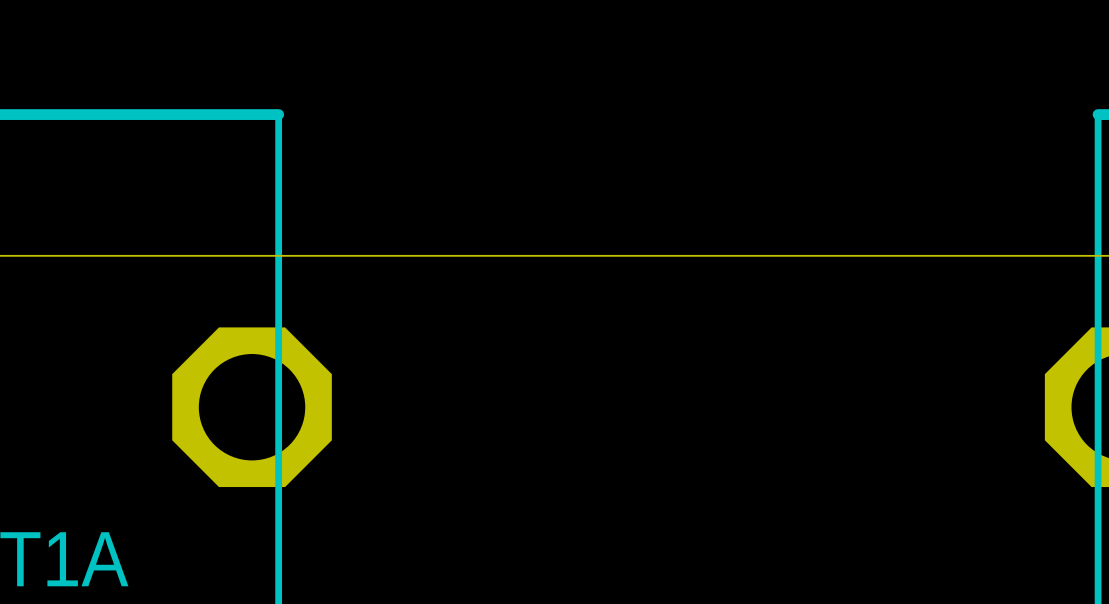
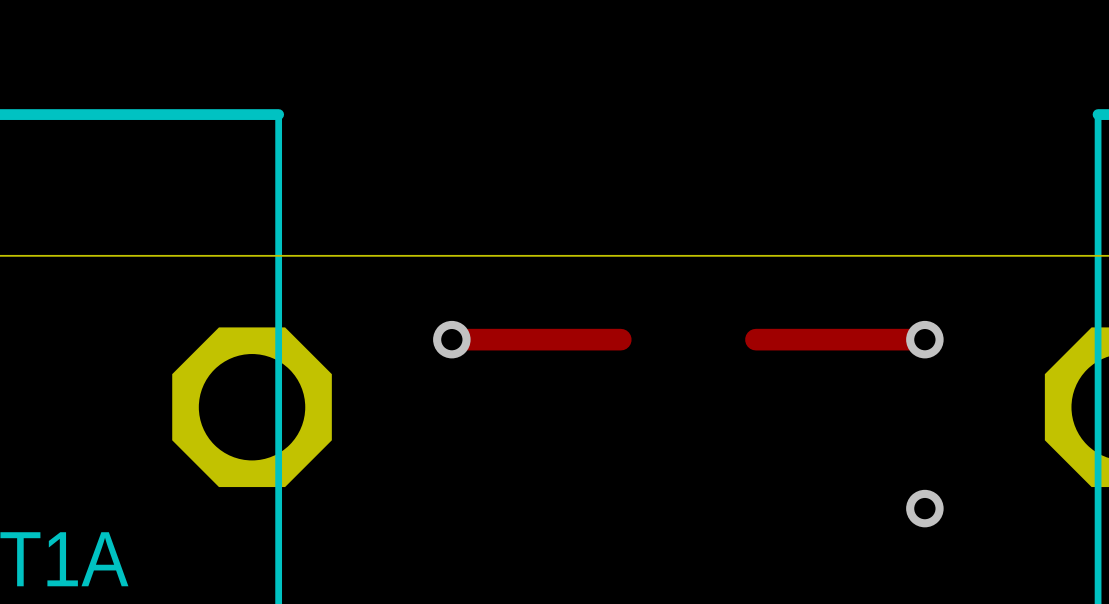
track: none -> (451, 339) (620, 339)
via: none -> (451, 339)
track: none -> (755, 339) (924, 339)
via: none -> (924, 339)
via: none -> (924, 508)

